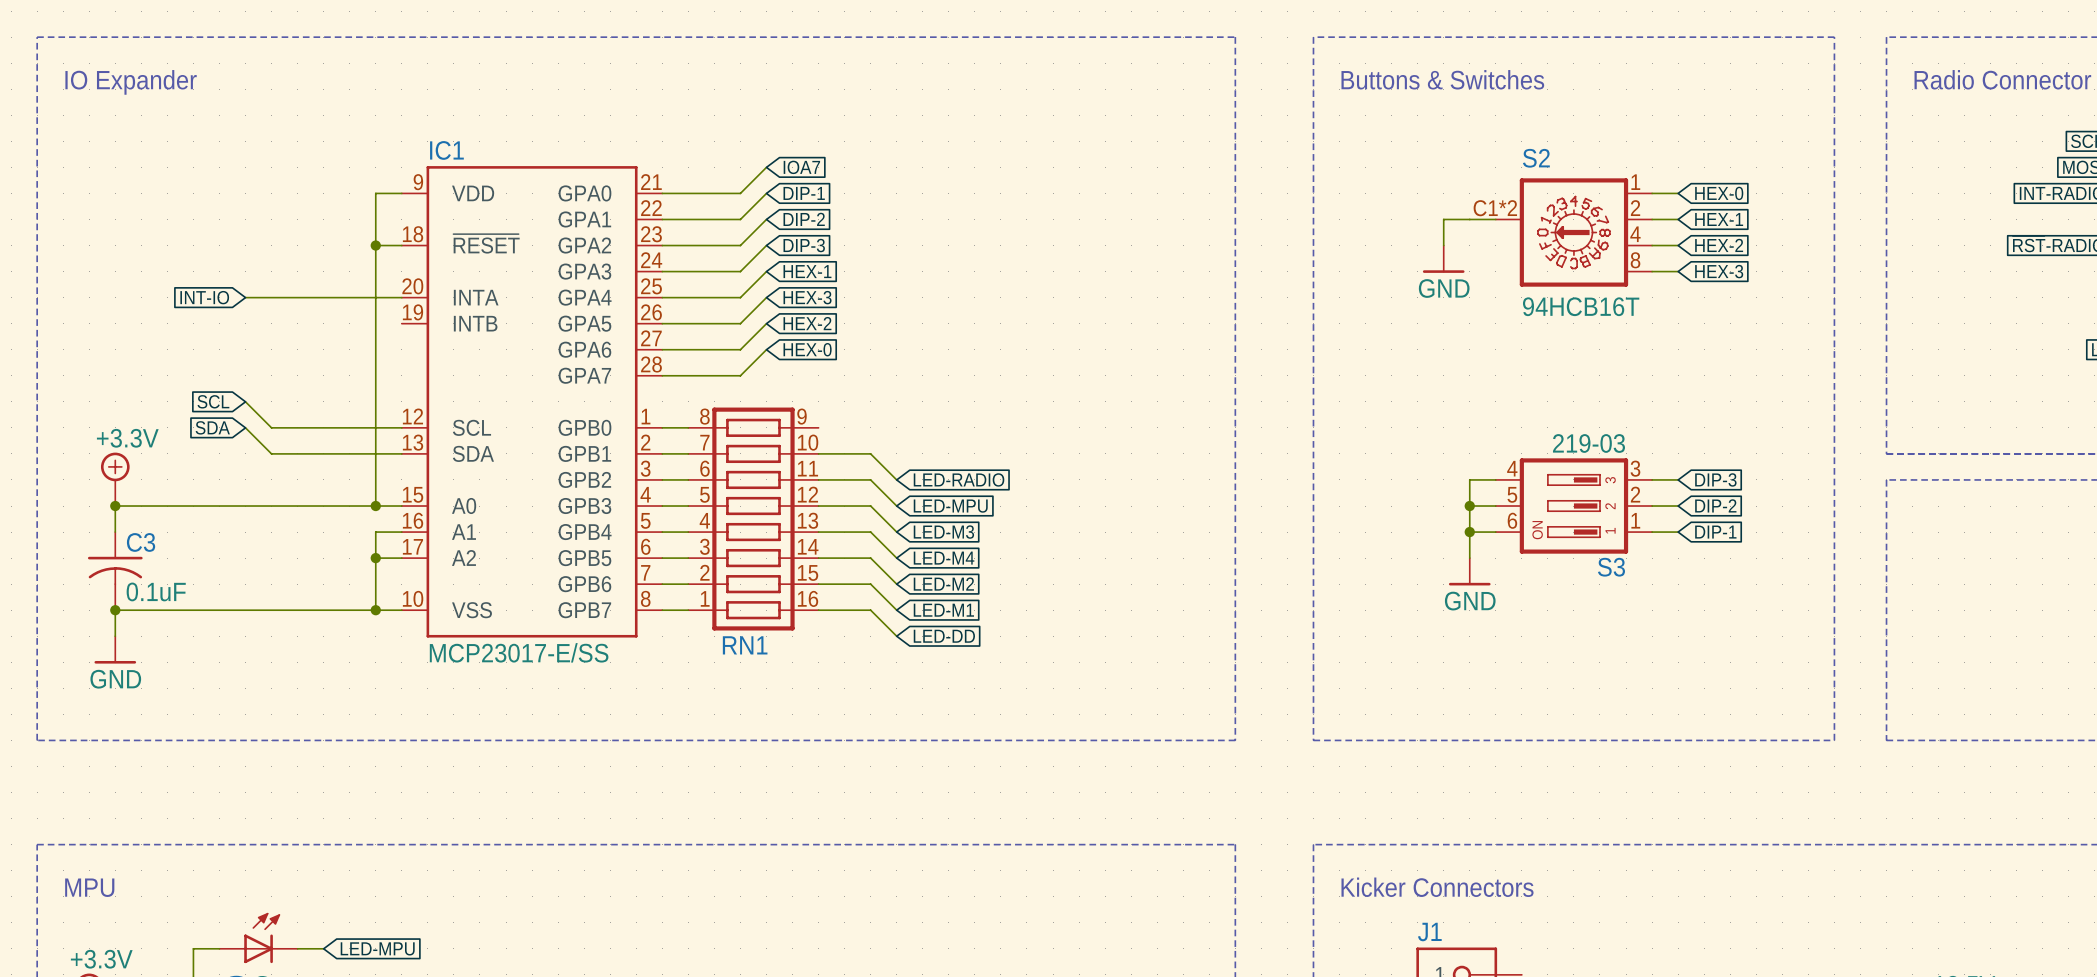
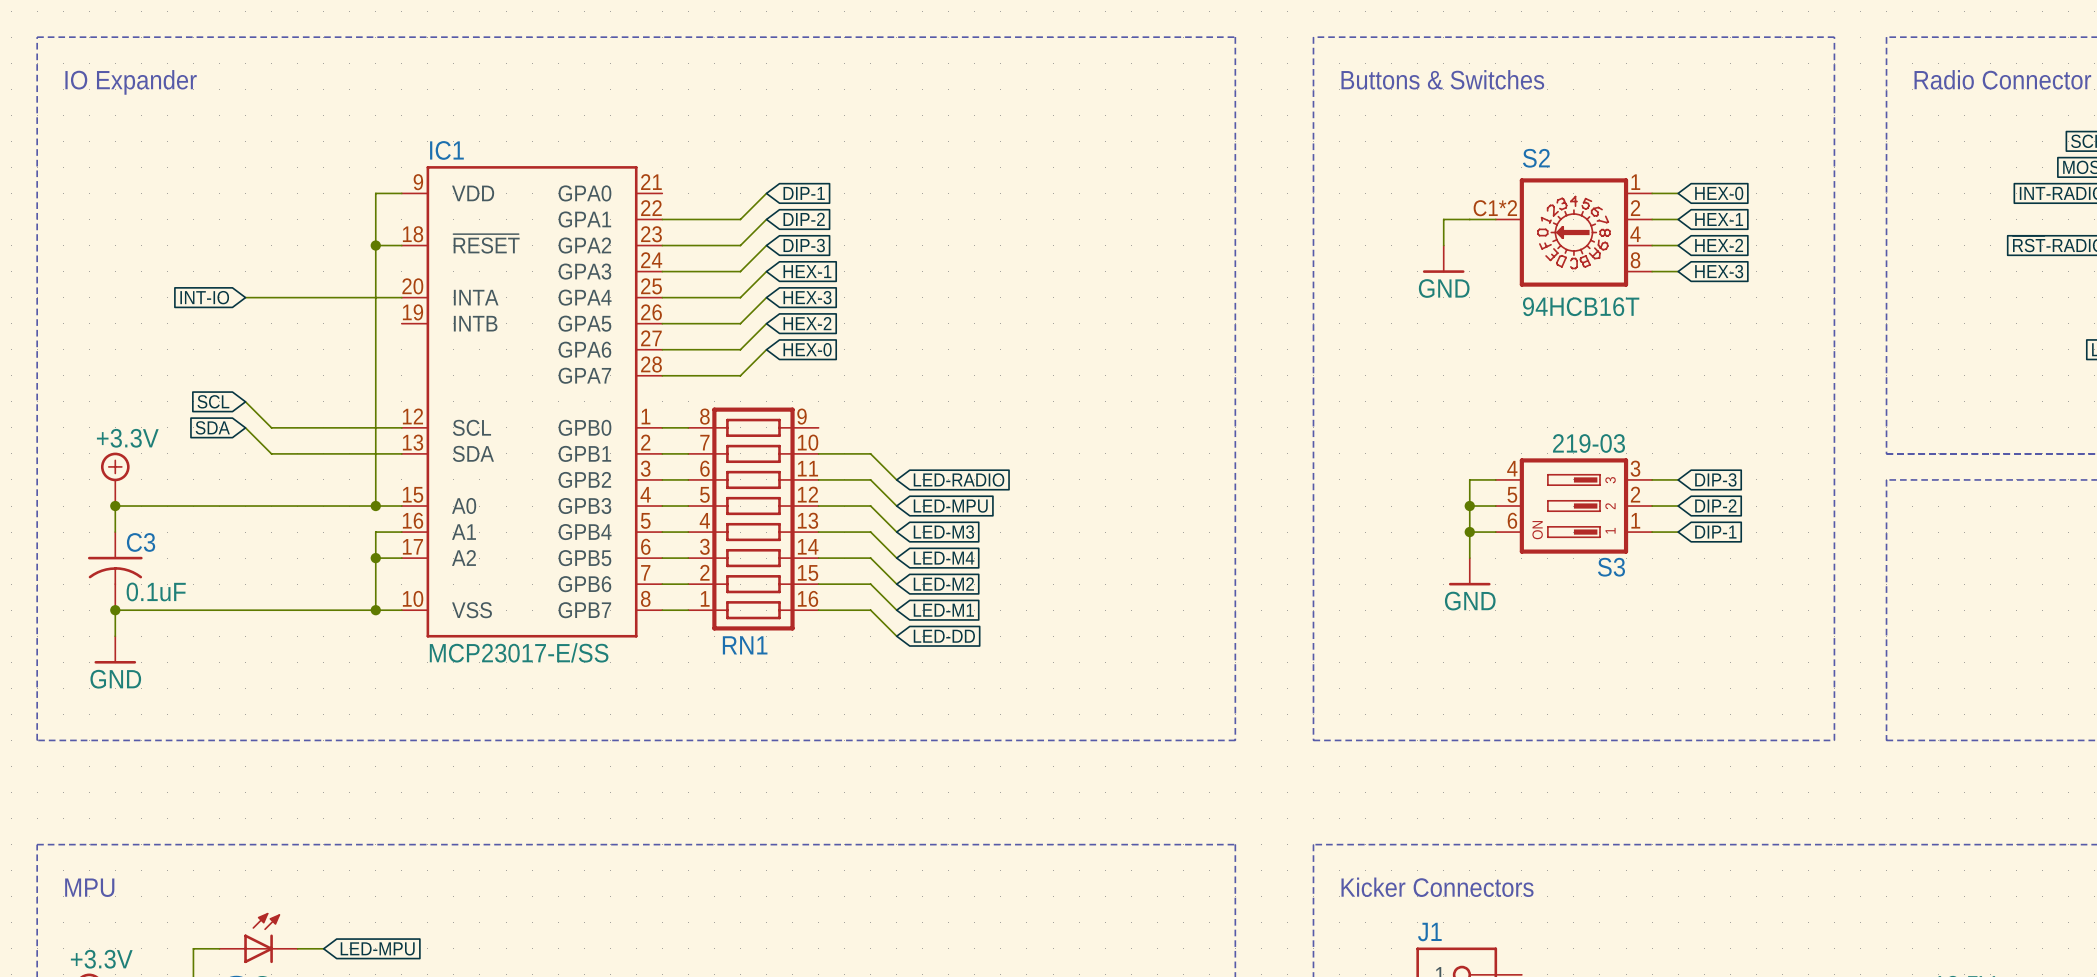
wire: (766, 167) (740, 193) (662, 193) -> none
global label: IOA7 (801, 167) -> none

